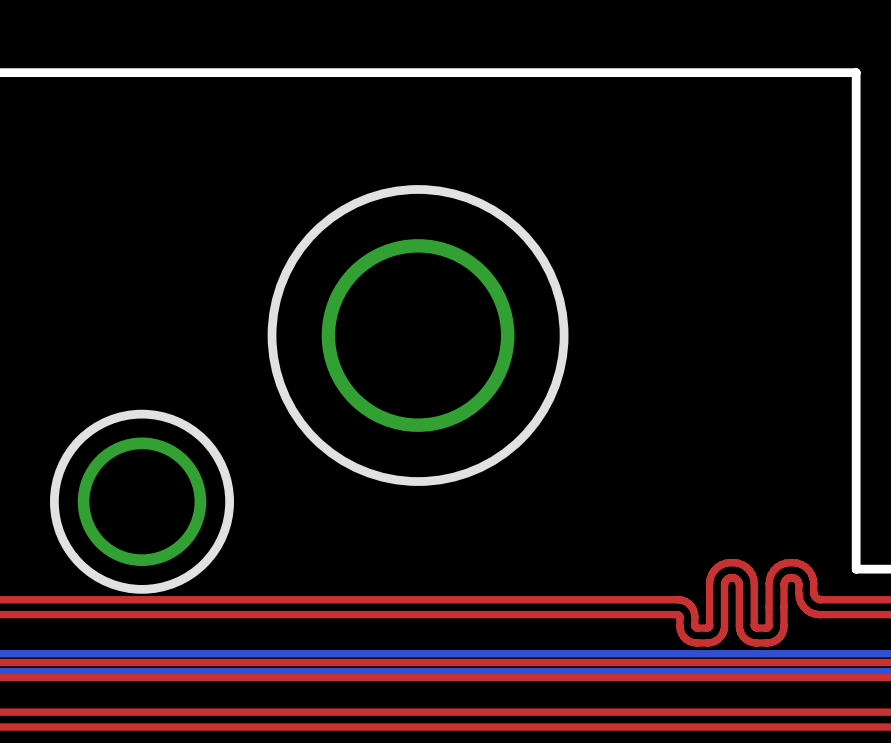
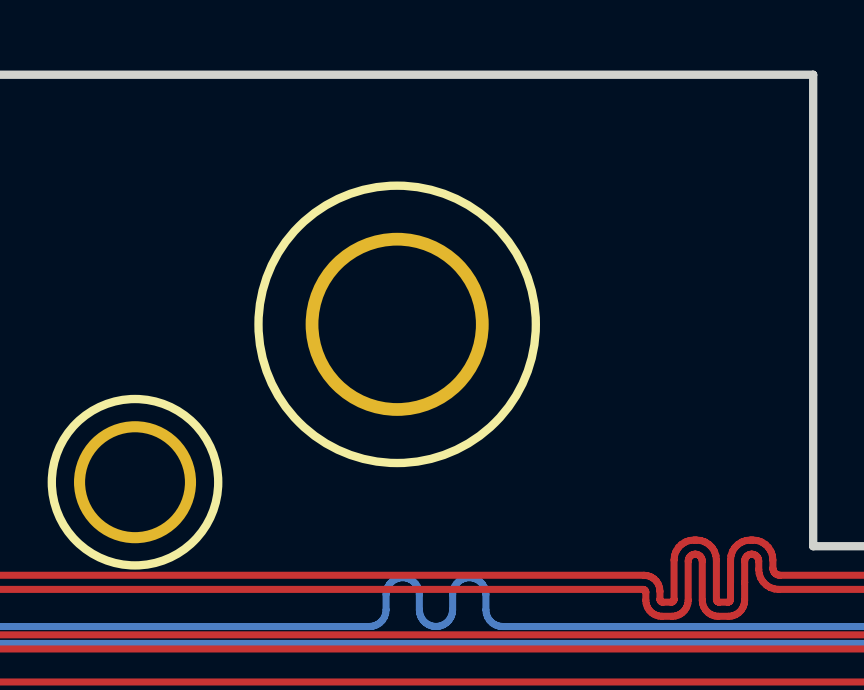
bottom track: (388, 653) (529, 653) -> (369, 626) (376, 624) (384, 617) (386, 590) (389, 583) (395, 579) (402, 577) (409, 579) (417, 587) (419, 613) (422, 620) (428, 624) (439, 626) (449, 620) (452, 613) (454, 587) (462, 579) (469, 577) (476, 579) (484, 587) (486, 613) (489, 620) (495, 624) (502, 626)

